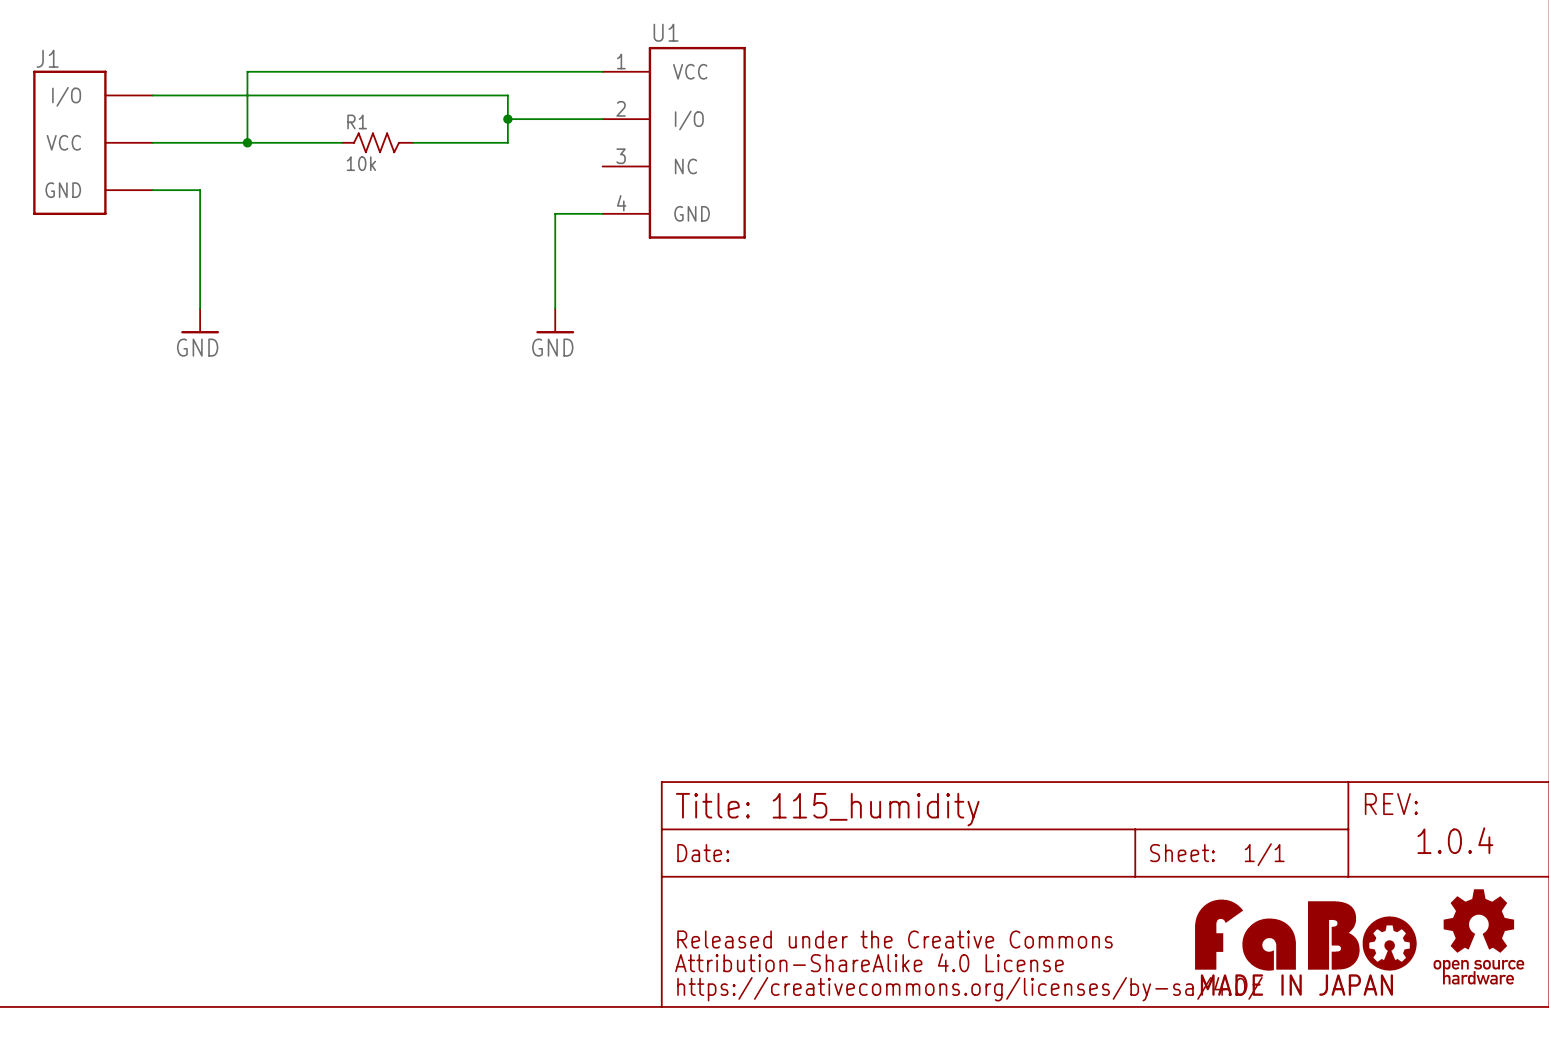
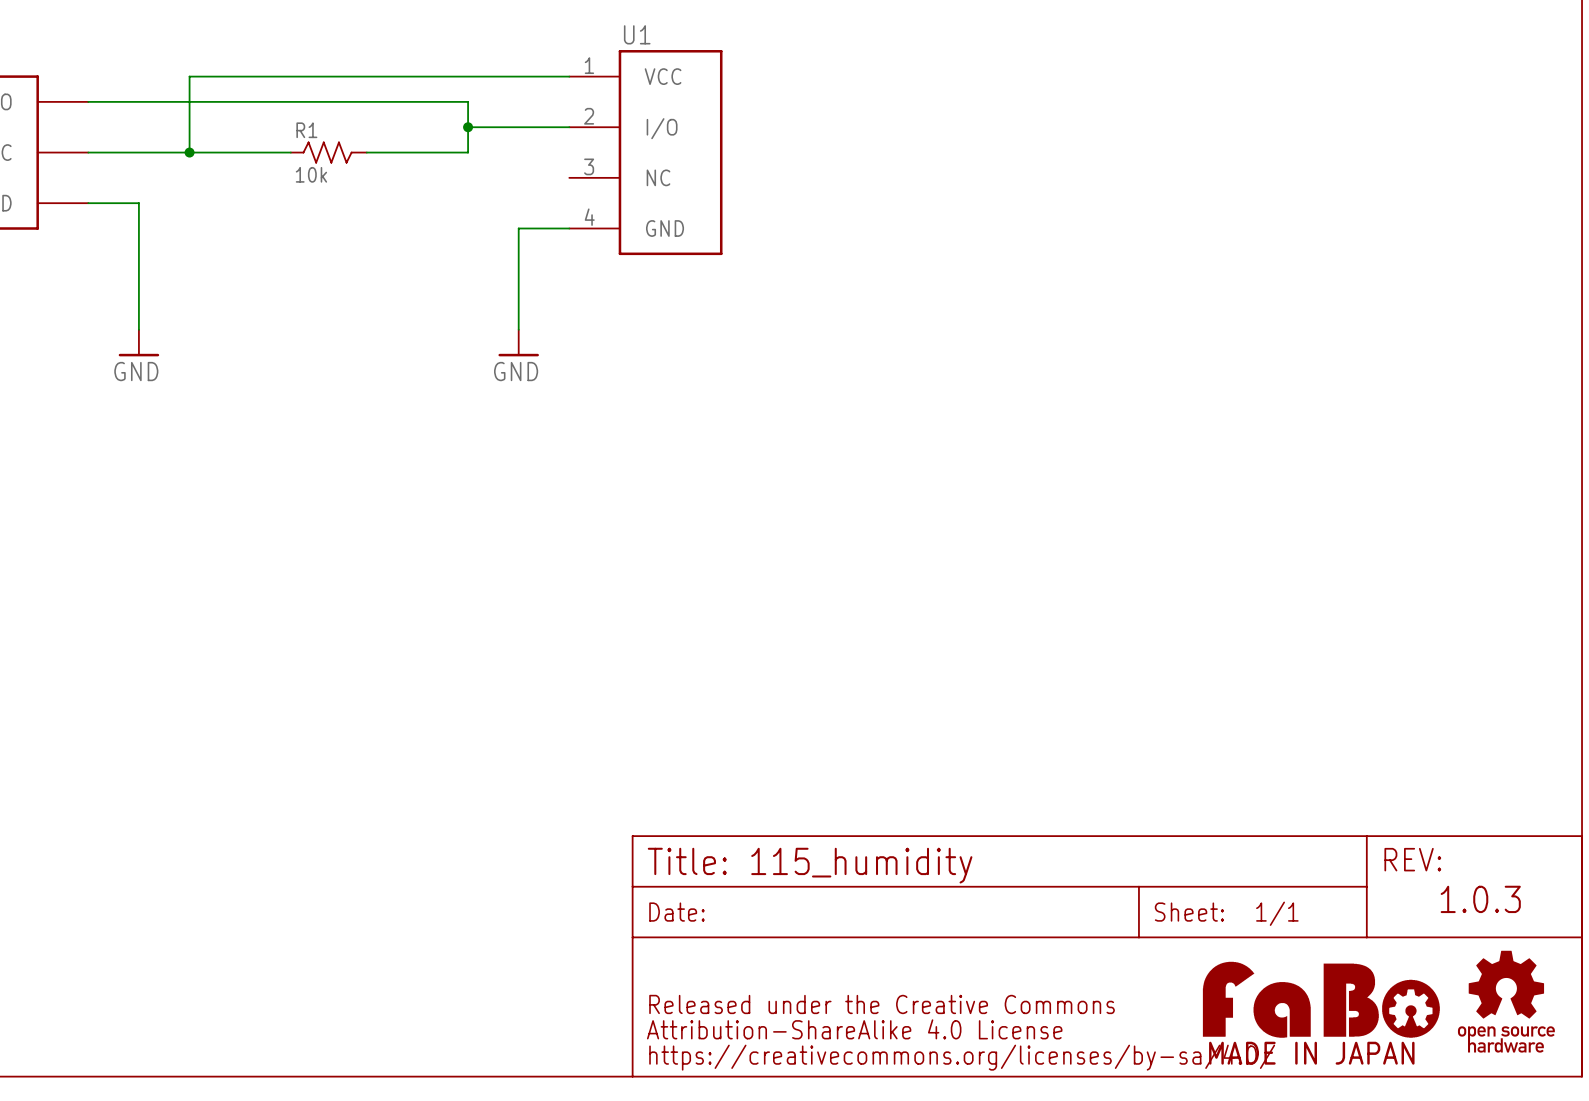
text: 1.0.4 (1455, 840) -> 1.0.3 (1480, 899)

